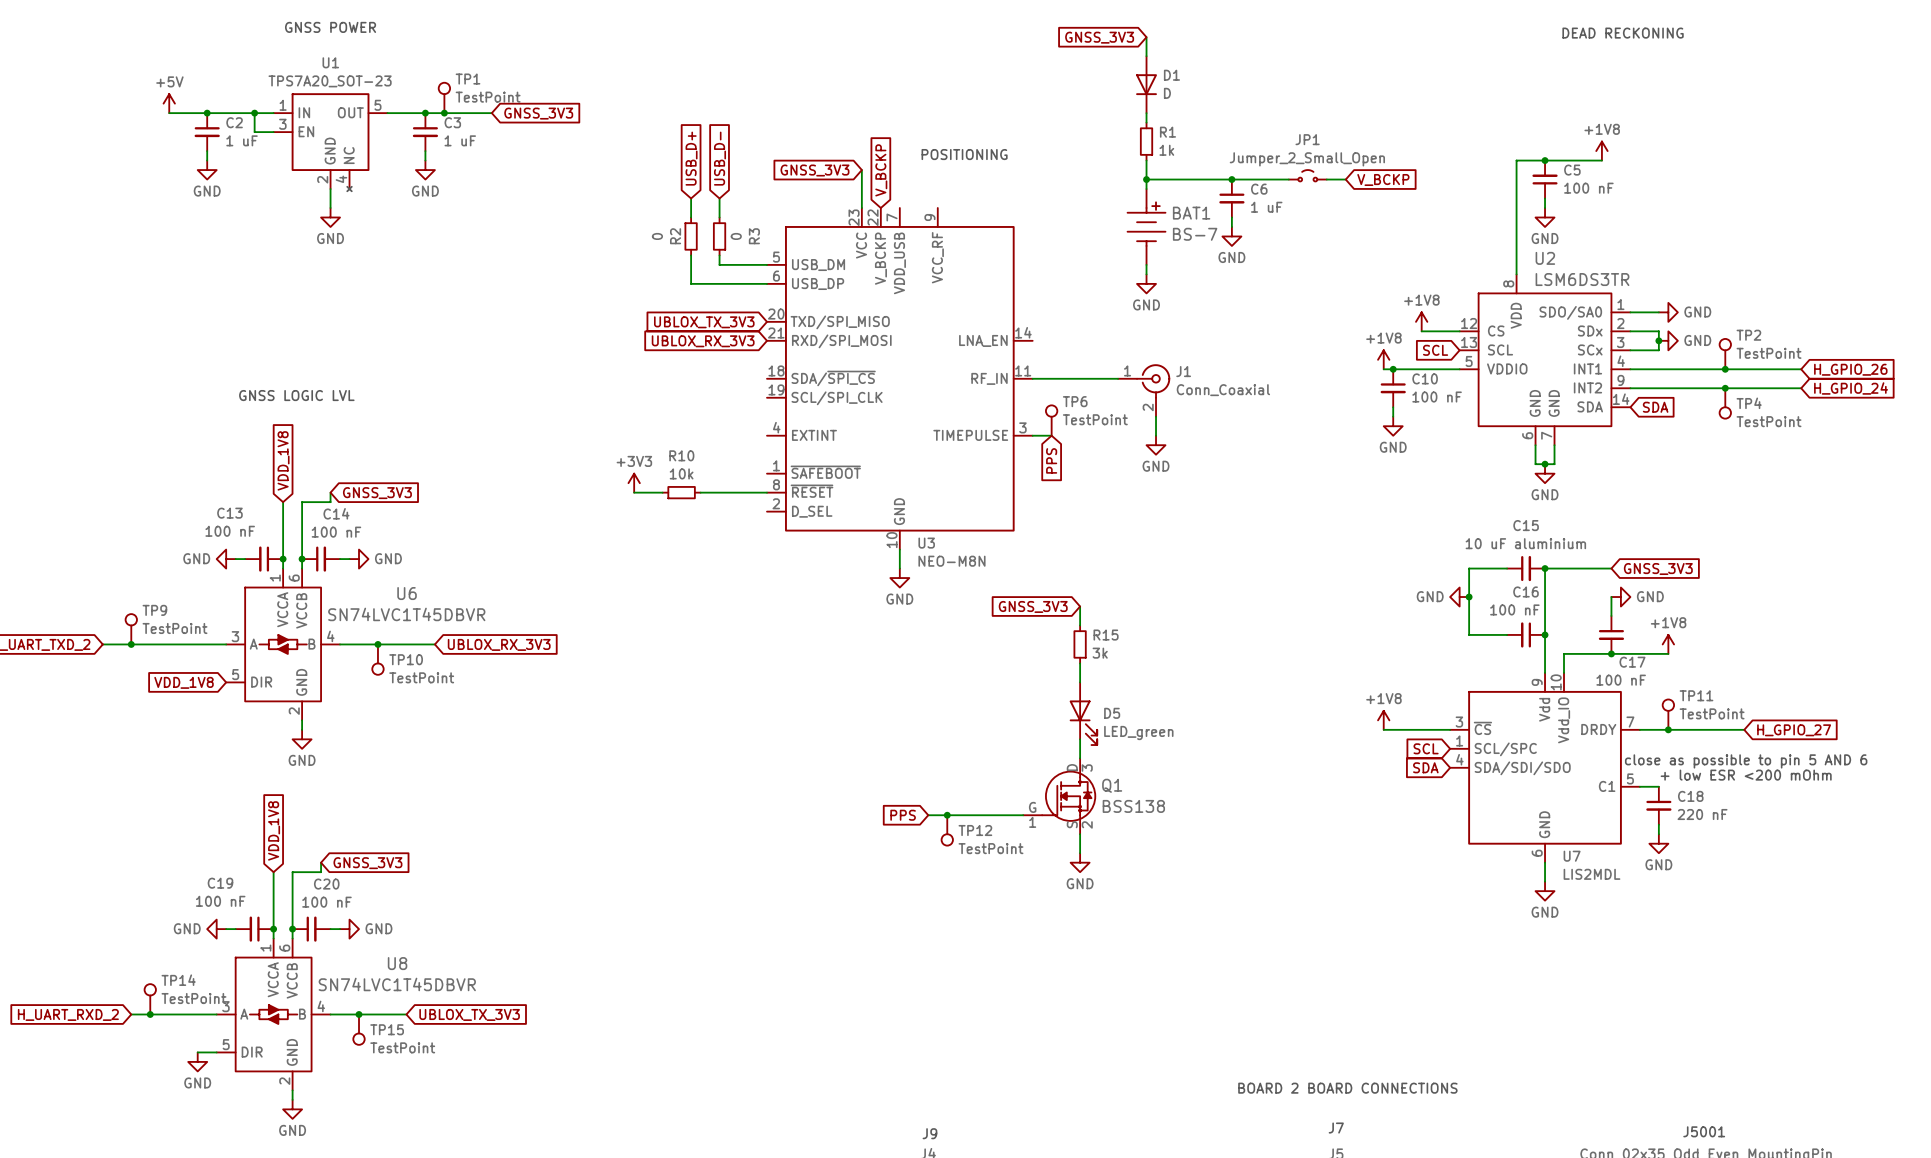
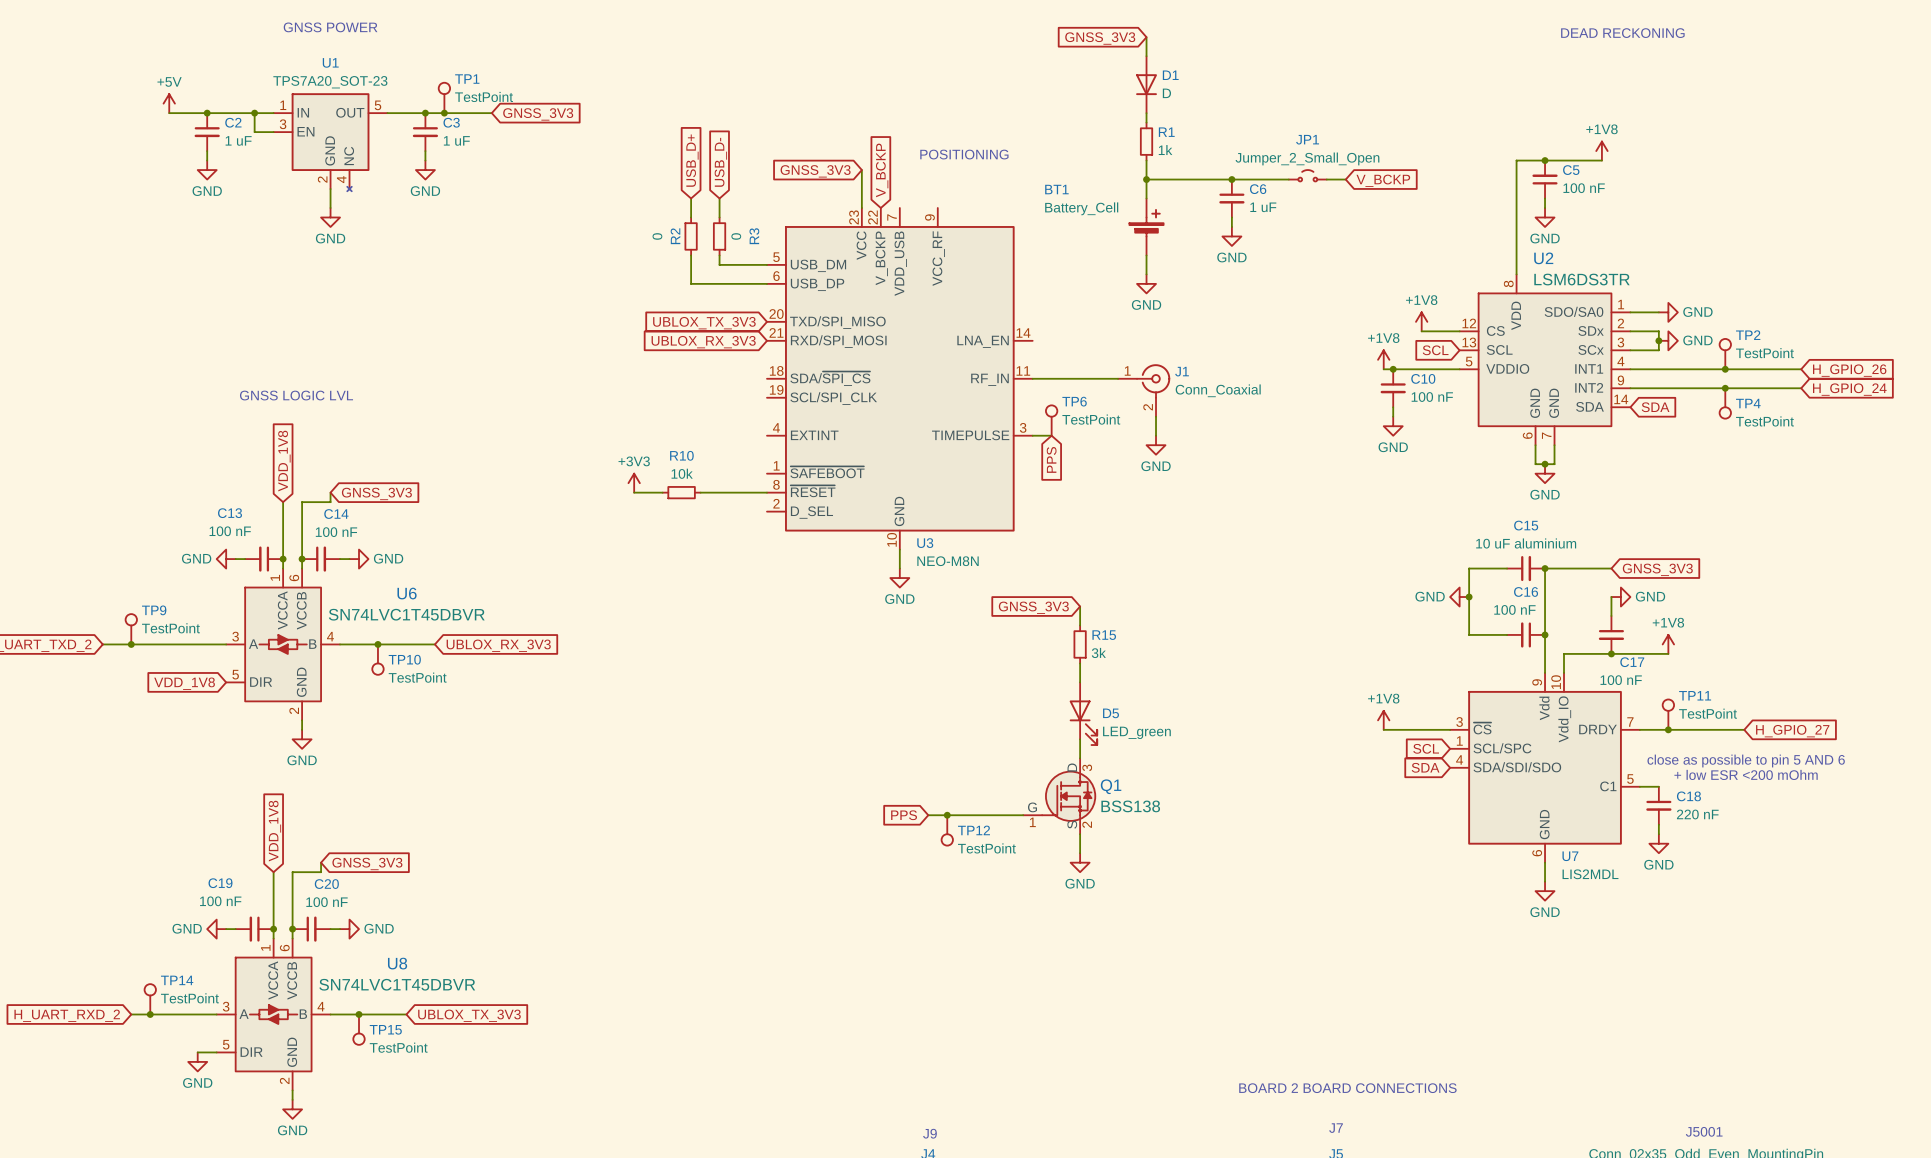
BAT1: BS-7 (1146, 226) -> none
BT1: none -> Battery_Cell (1146, 226)

